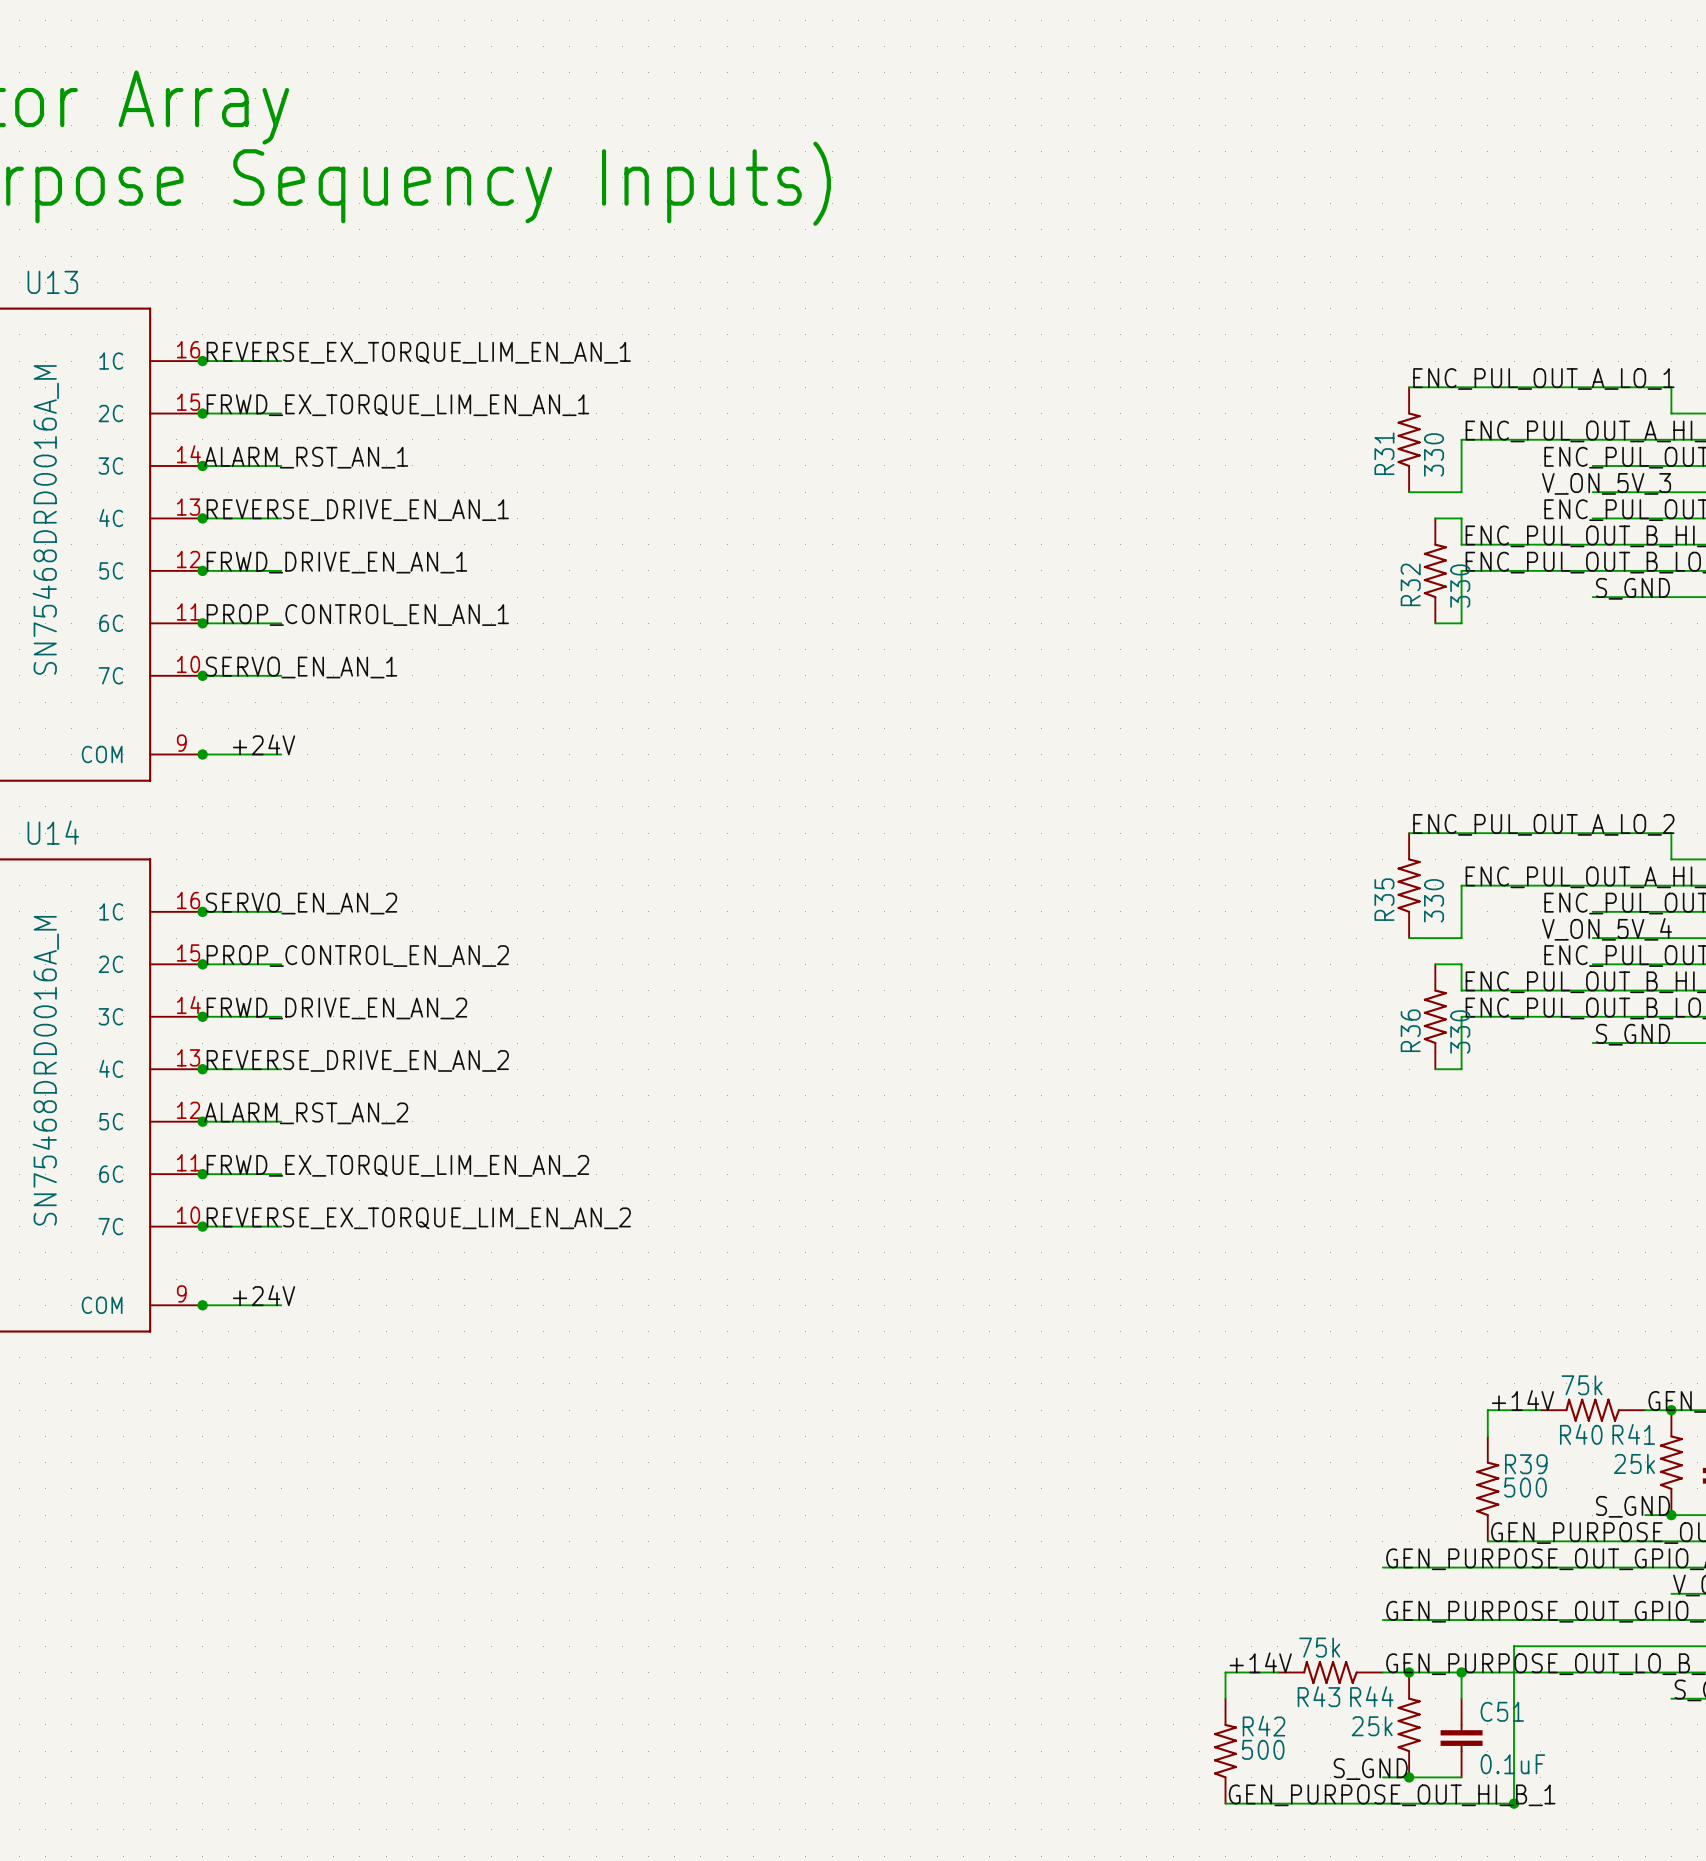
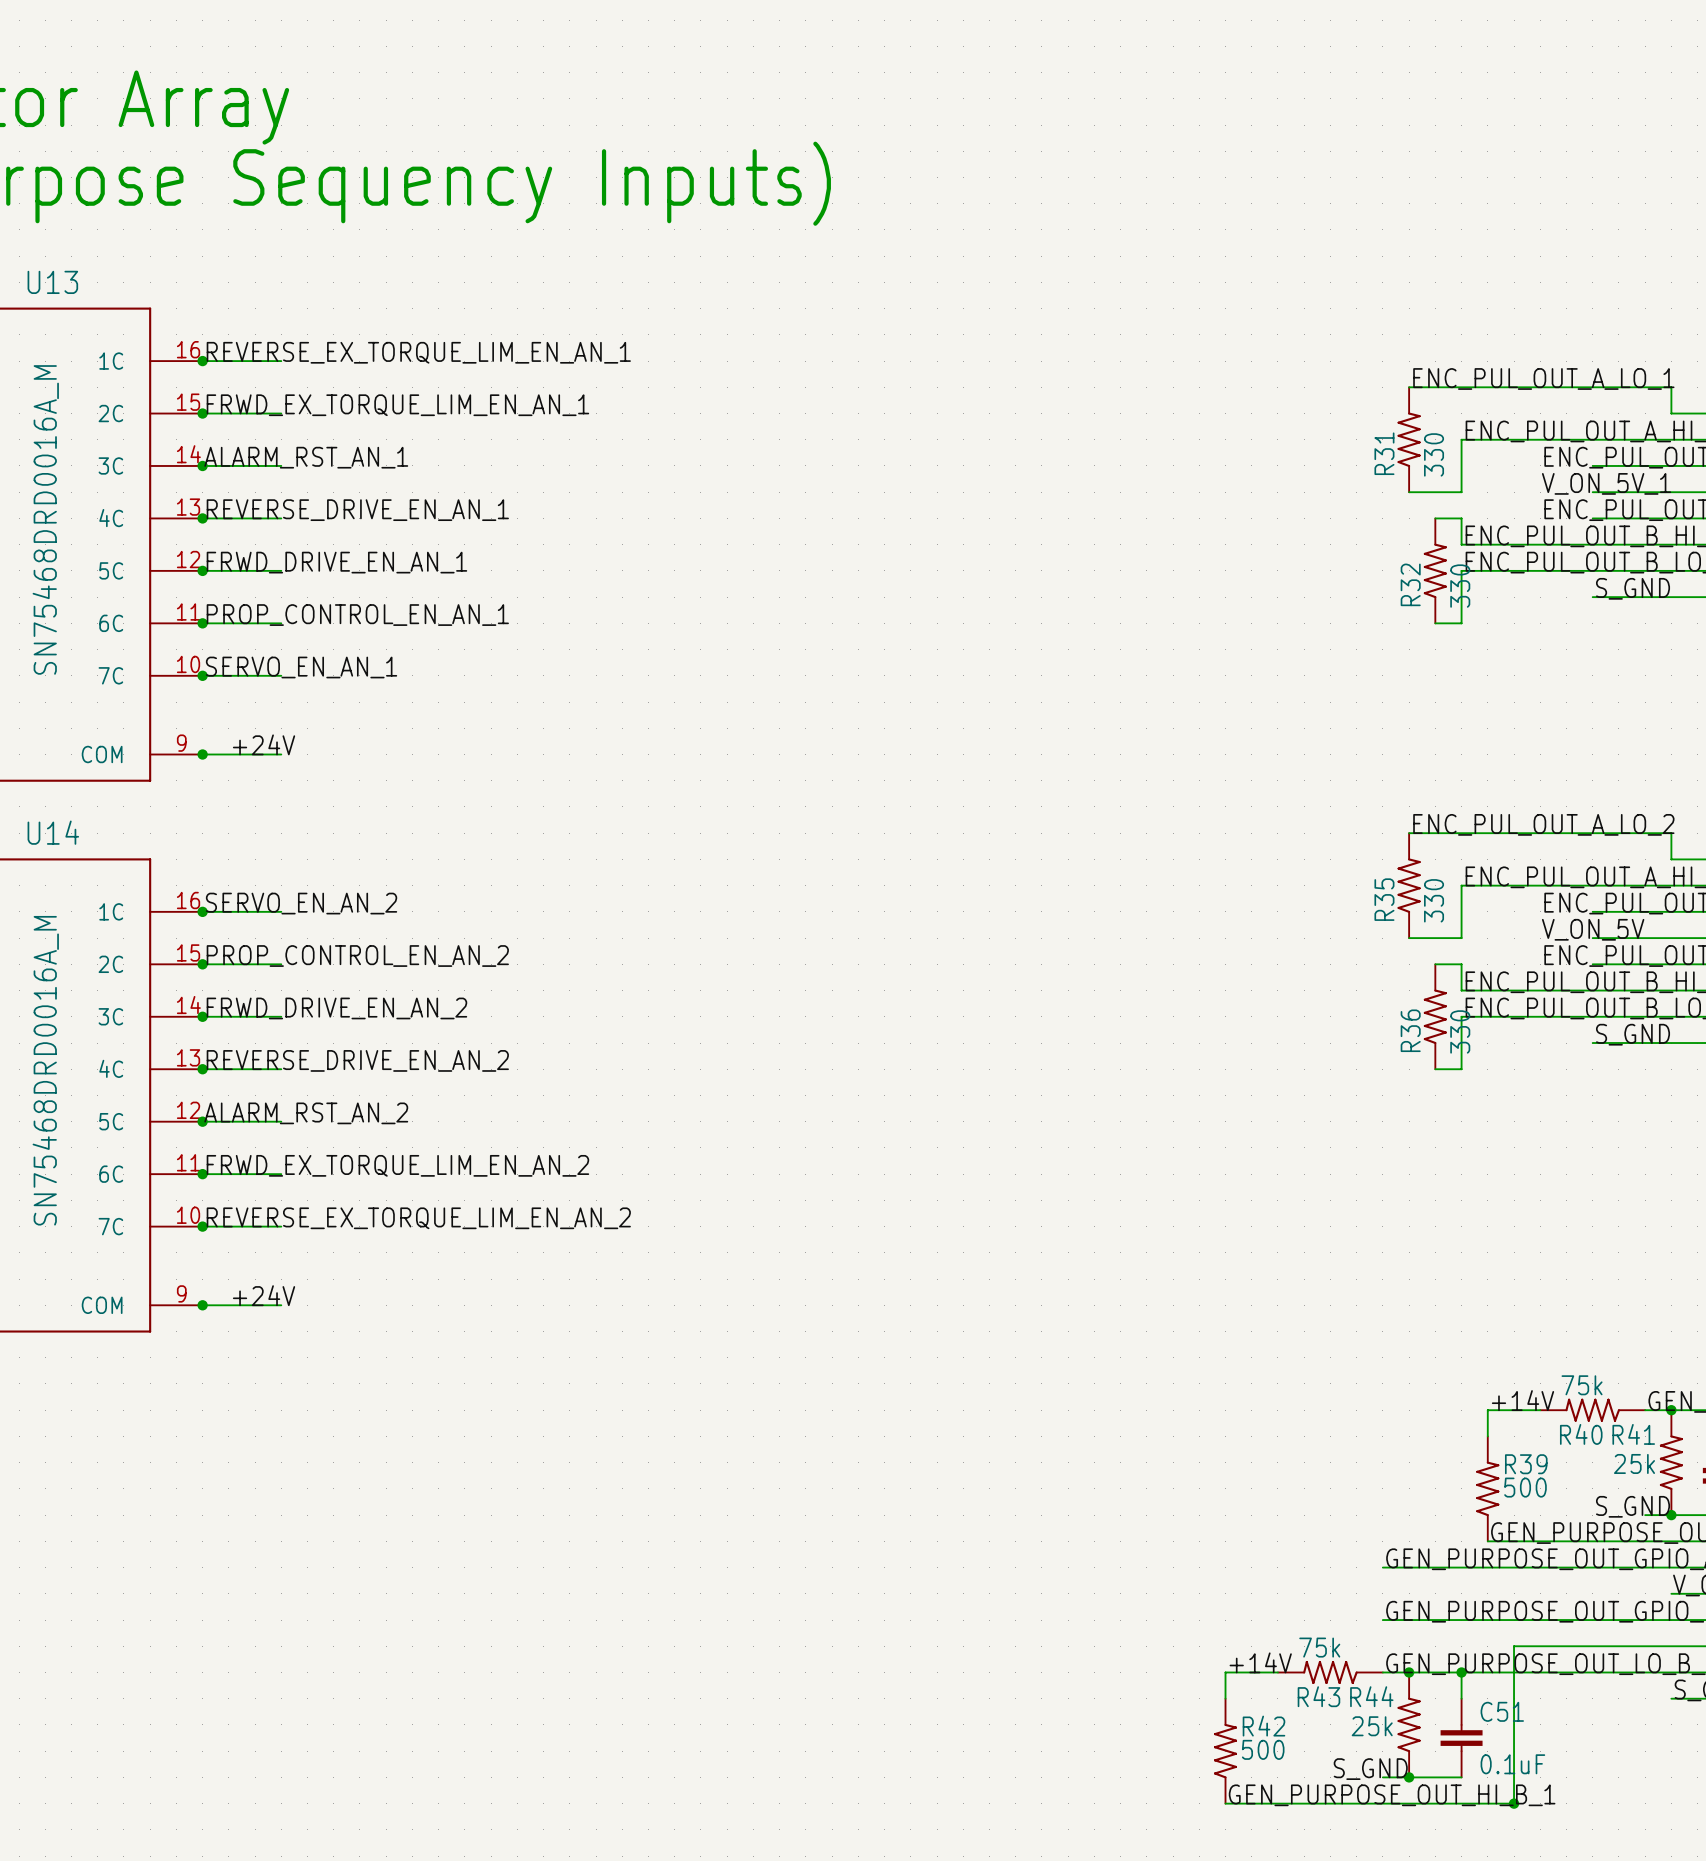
label: V_ON_5V_3 (1606, 483) -> V_ON_5V_1 (1606, 483)
label: V_ON_5V_4 (1606, 929) -> V_ON_5V (1593, 929)

